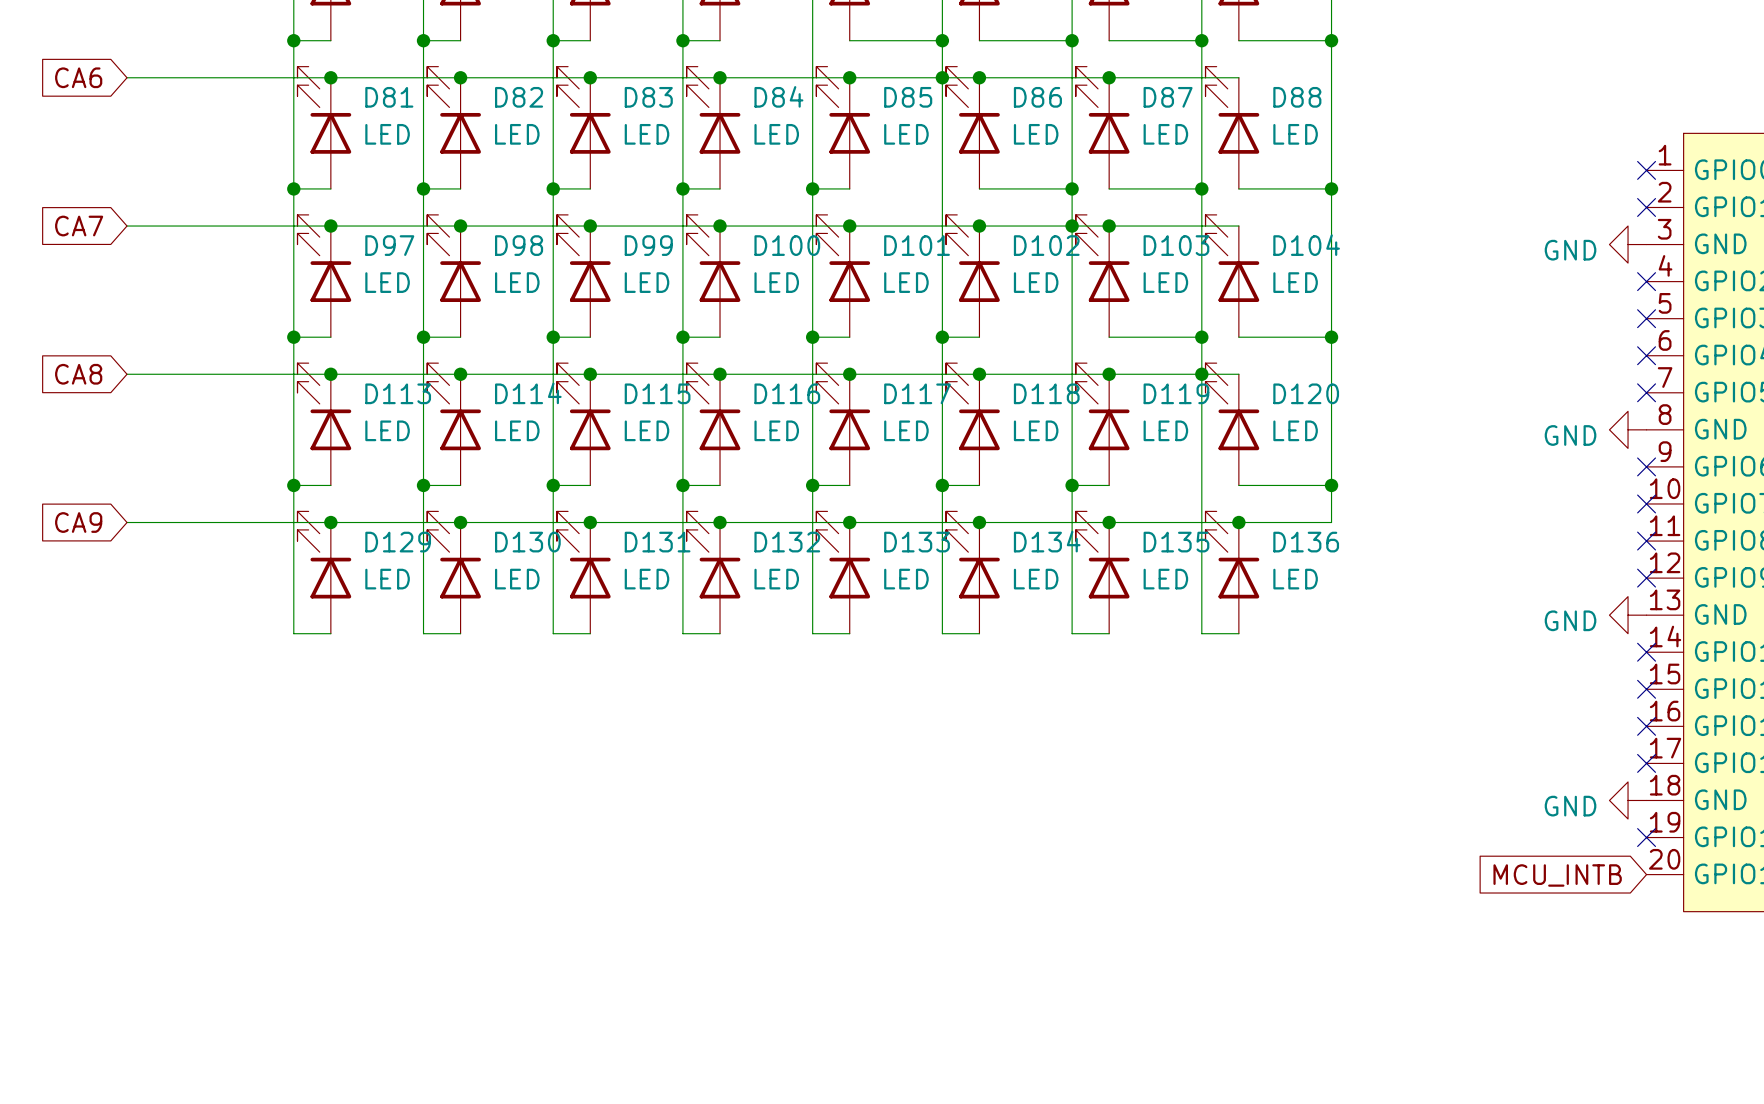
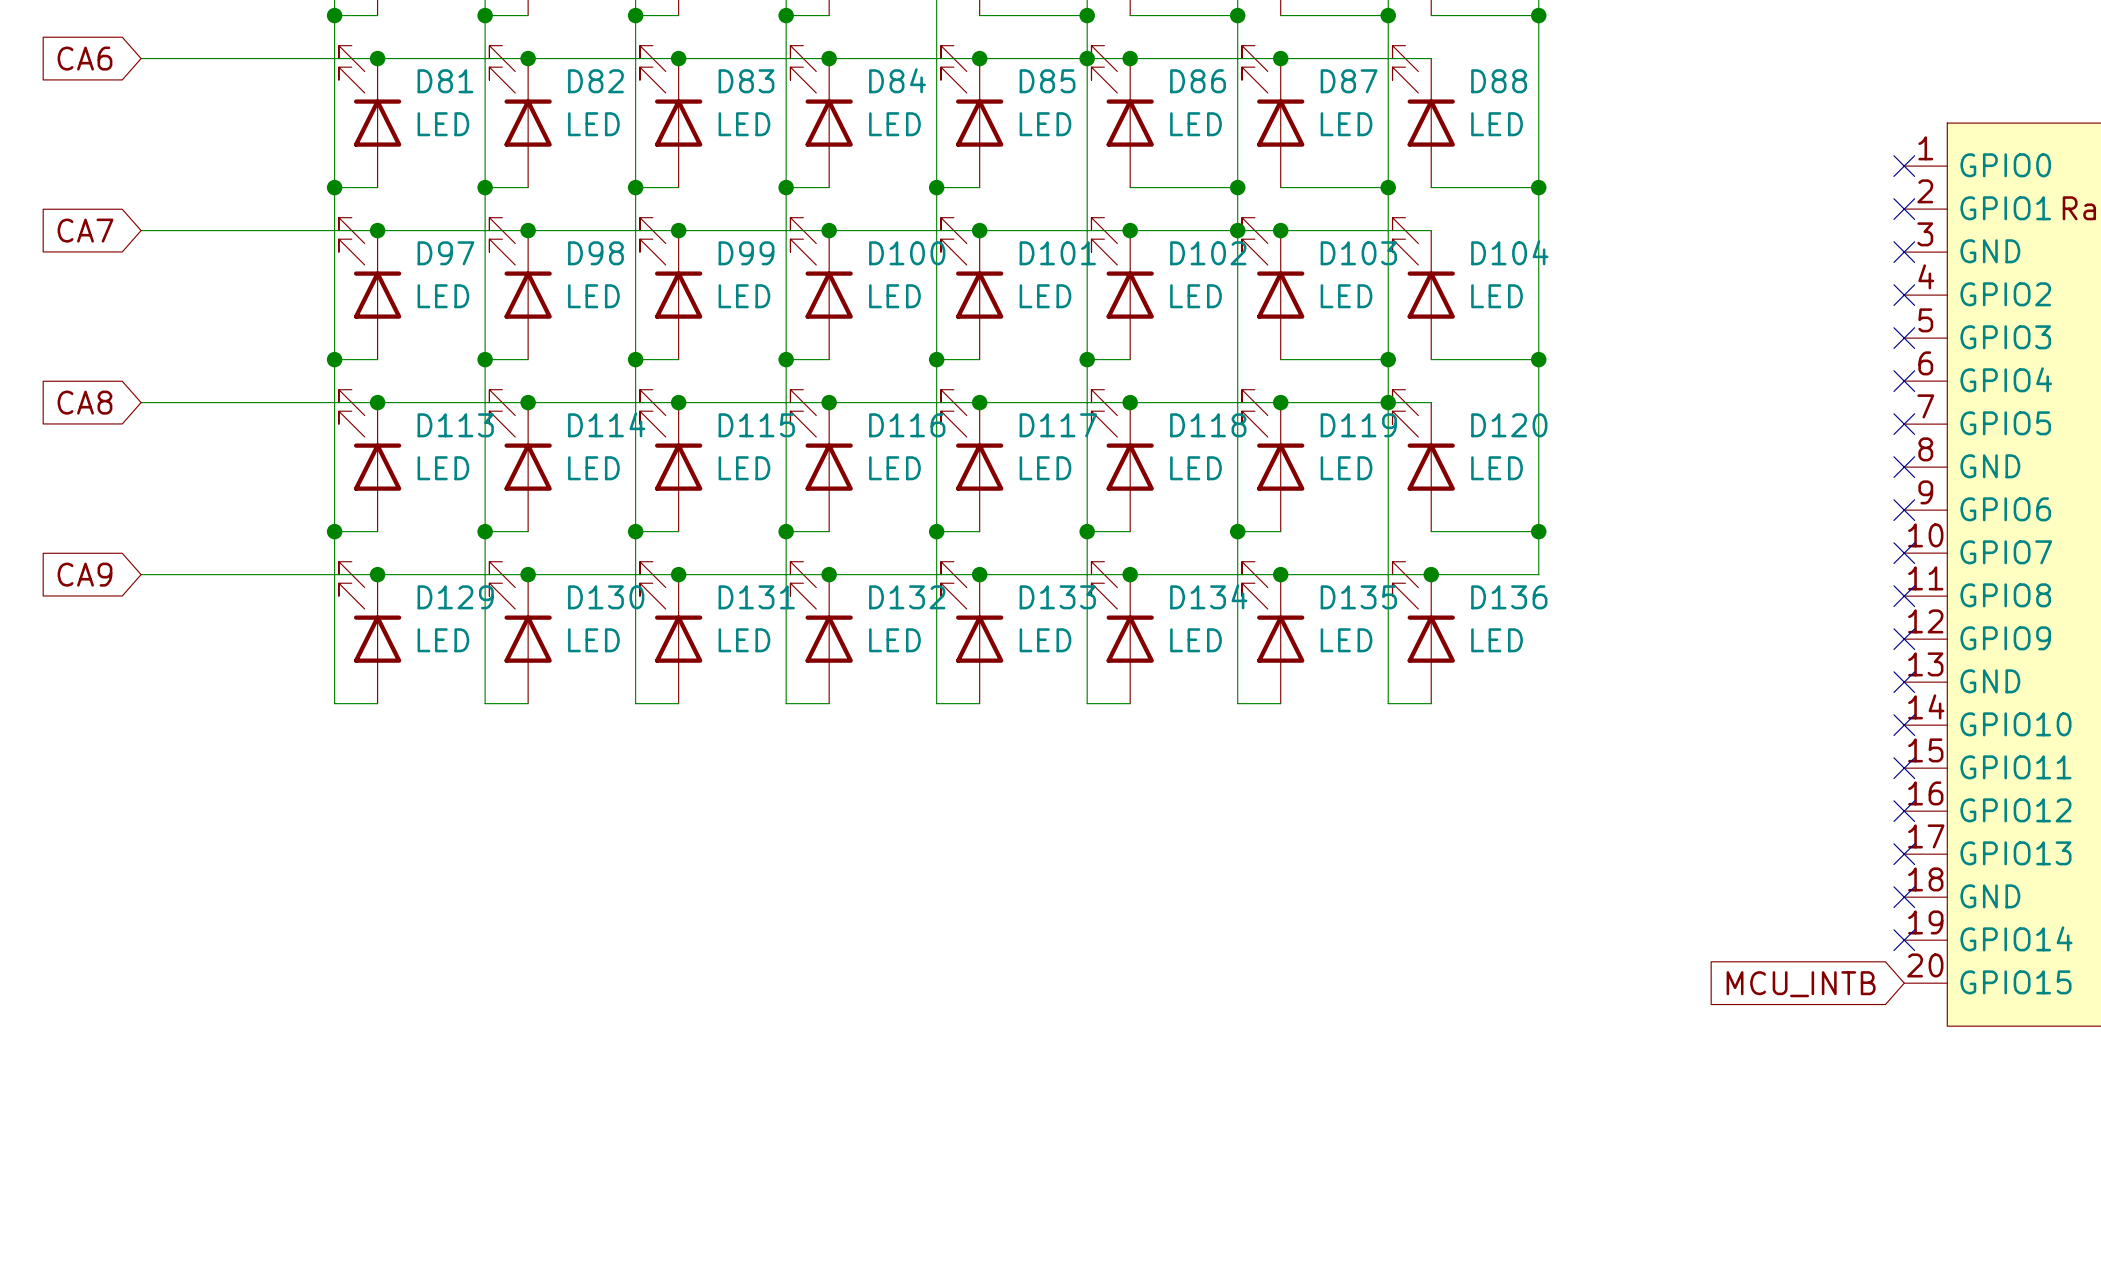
power symbol: GND (1628, 244) -> none
no-connect mark: none -> (1904, 252)
power symbol: GND (1628, 429) -> none
no-connect mark: none -> (1904, 467)
power symbol: GND (1628, 615) -> none
no-connect mark: none -> (1904, 682)
power symbol: GND (1628, 800) -> none
no-connect mark: none -> (1904, 897)

